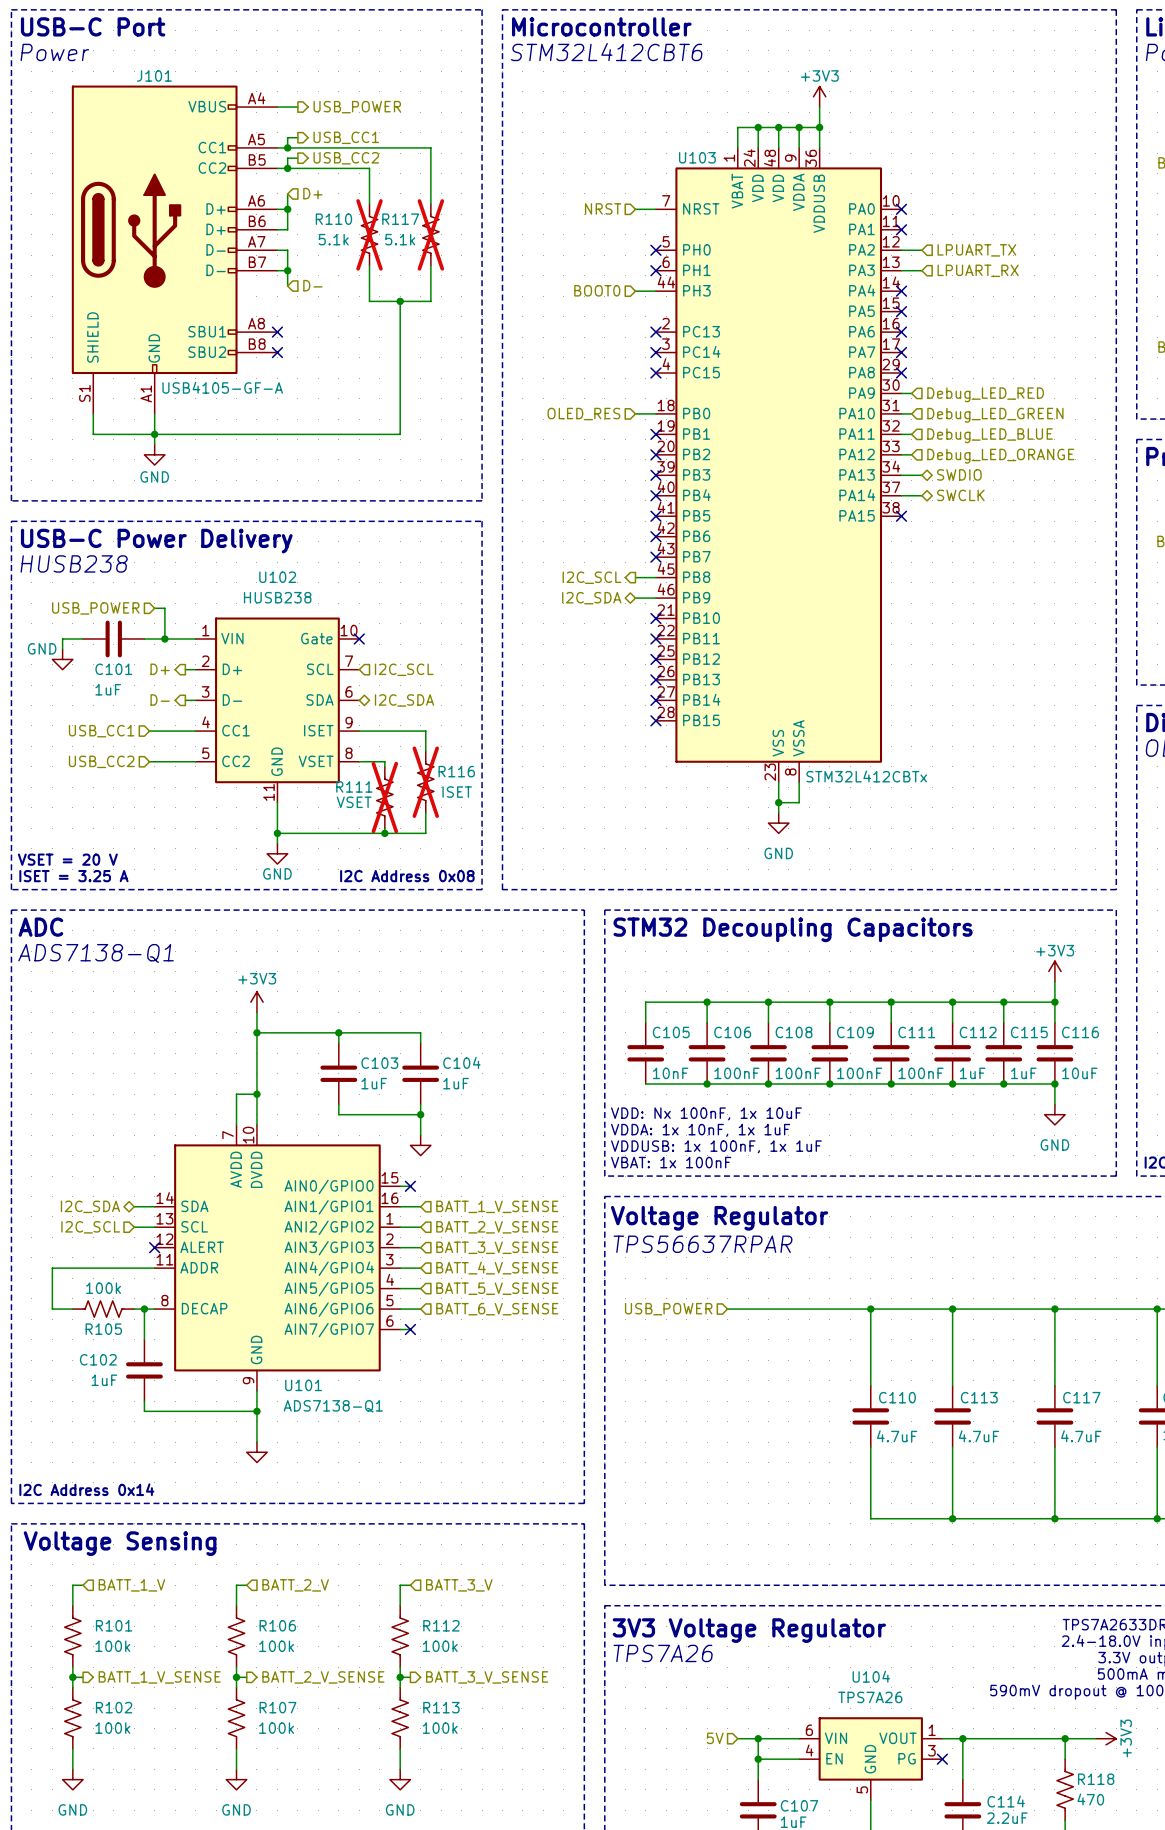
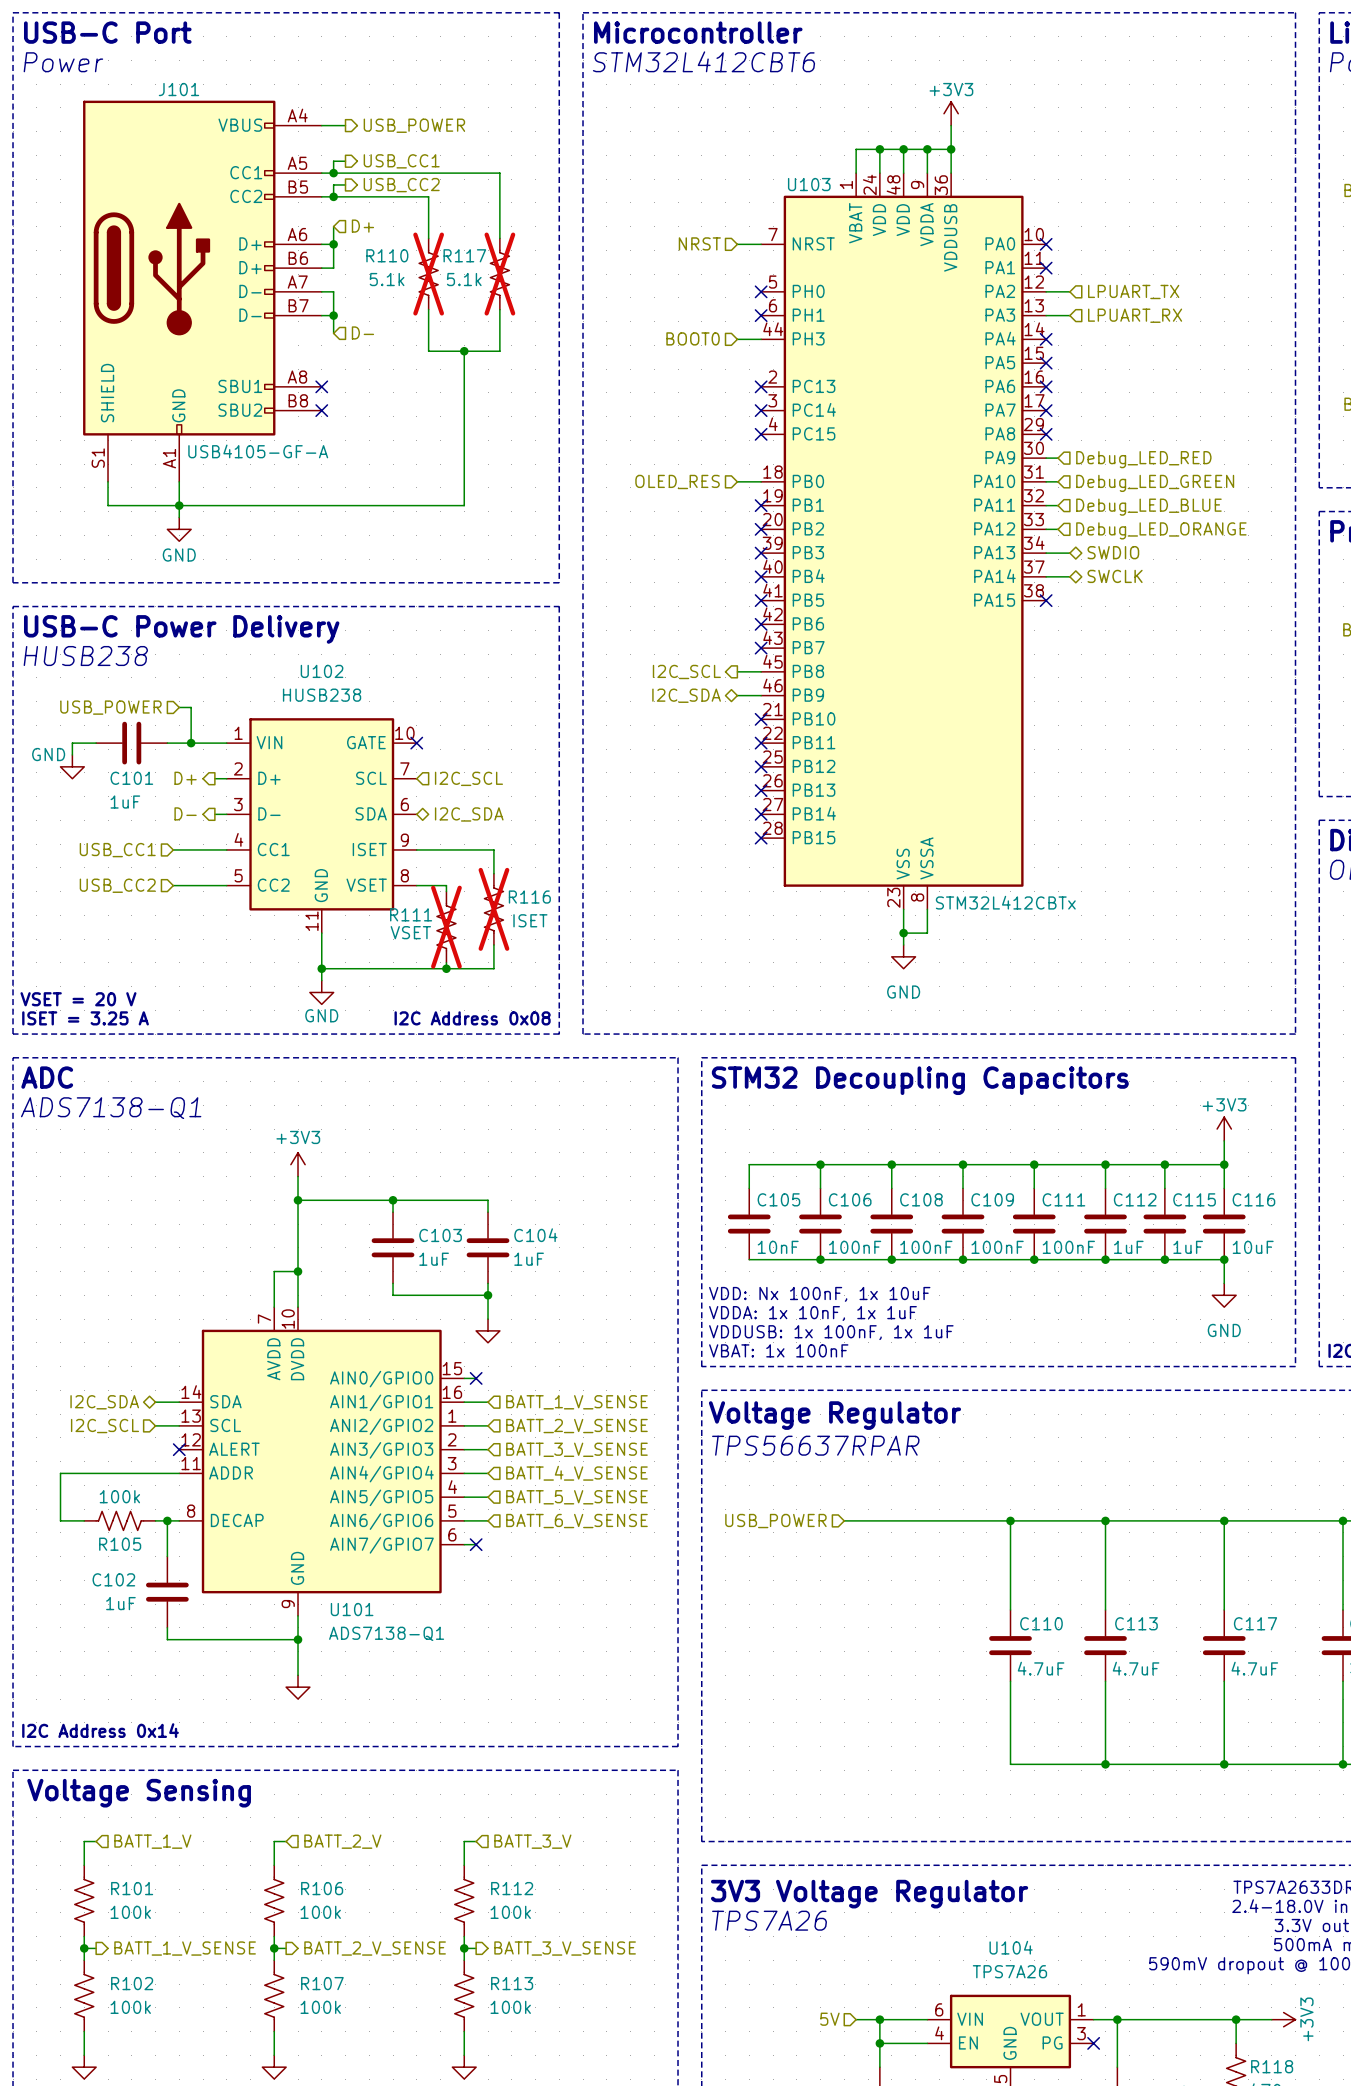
U102 pin name: Gate (316, 638) -> GATE (366, 742)

